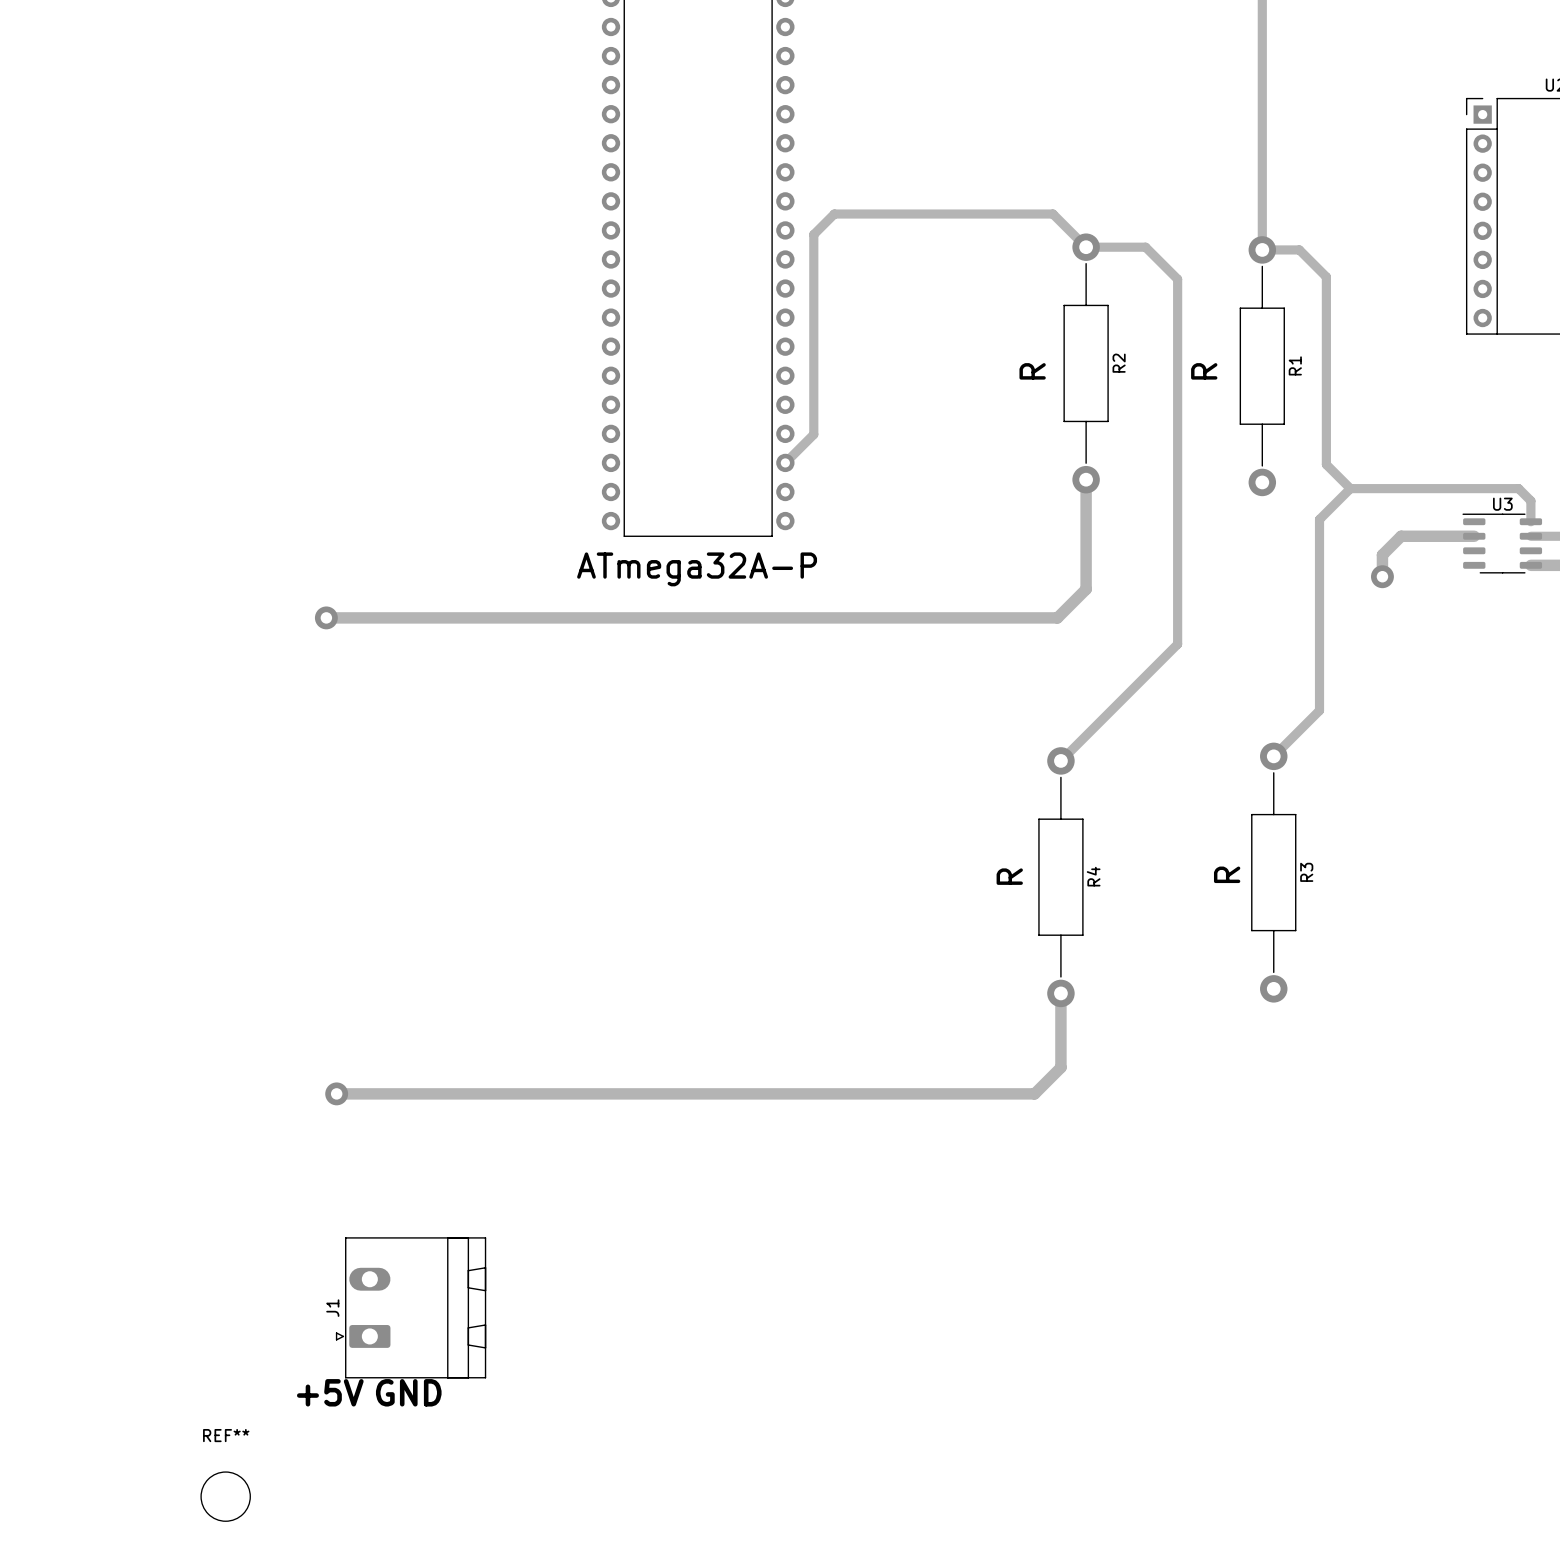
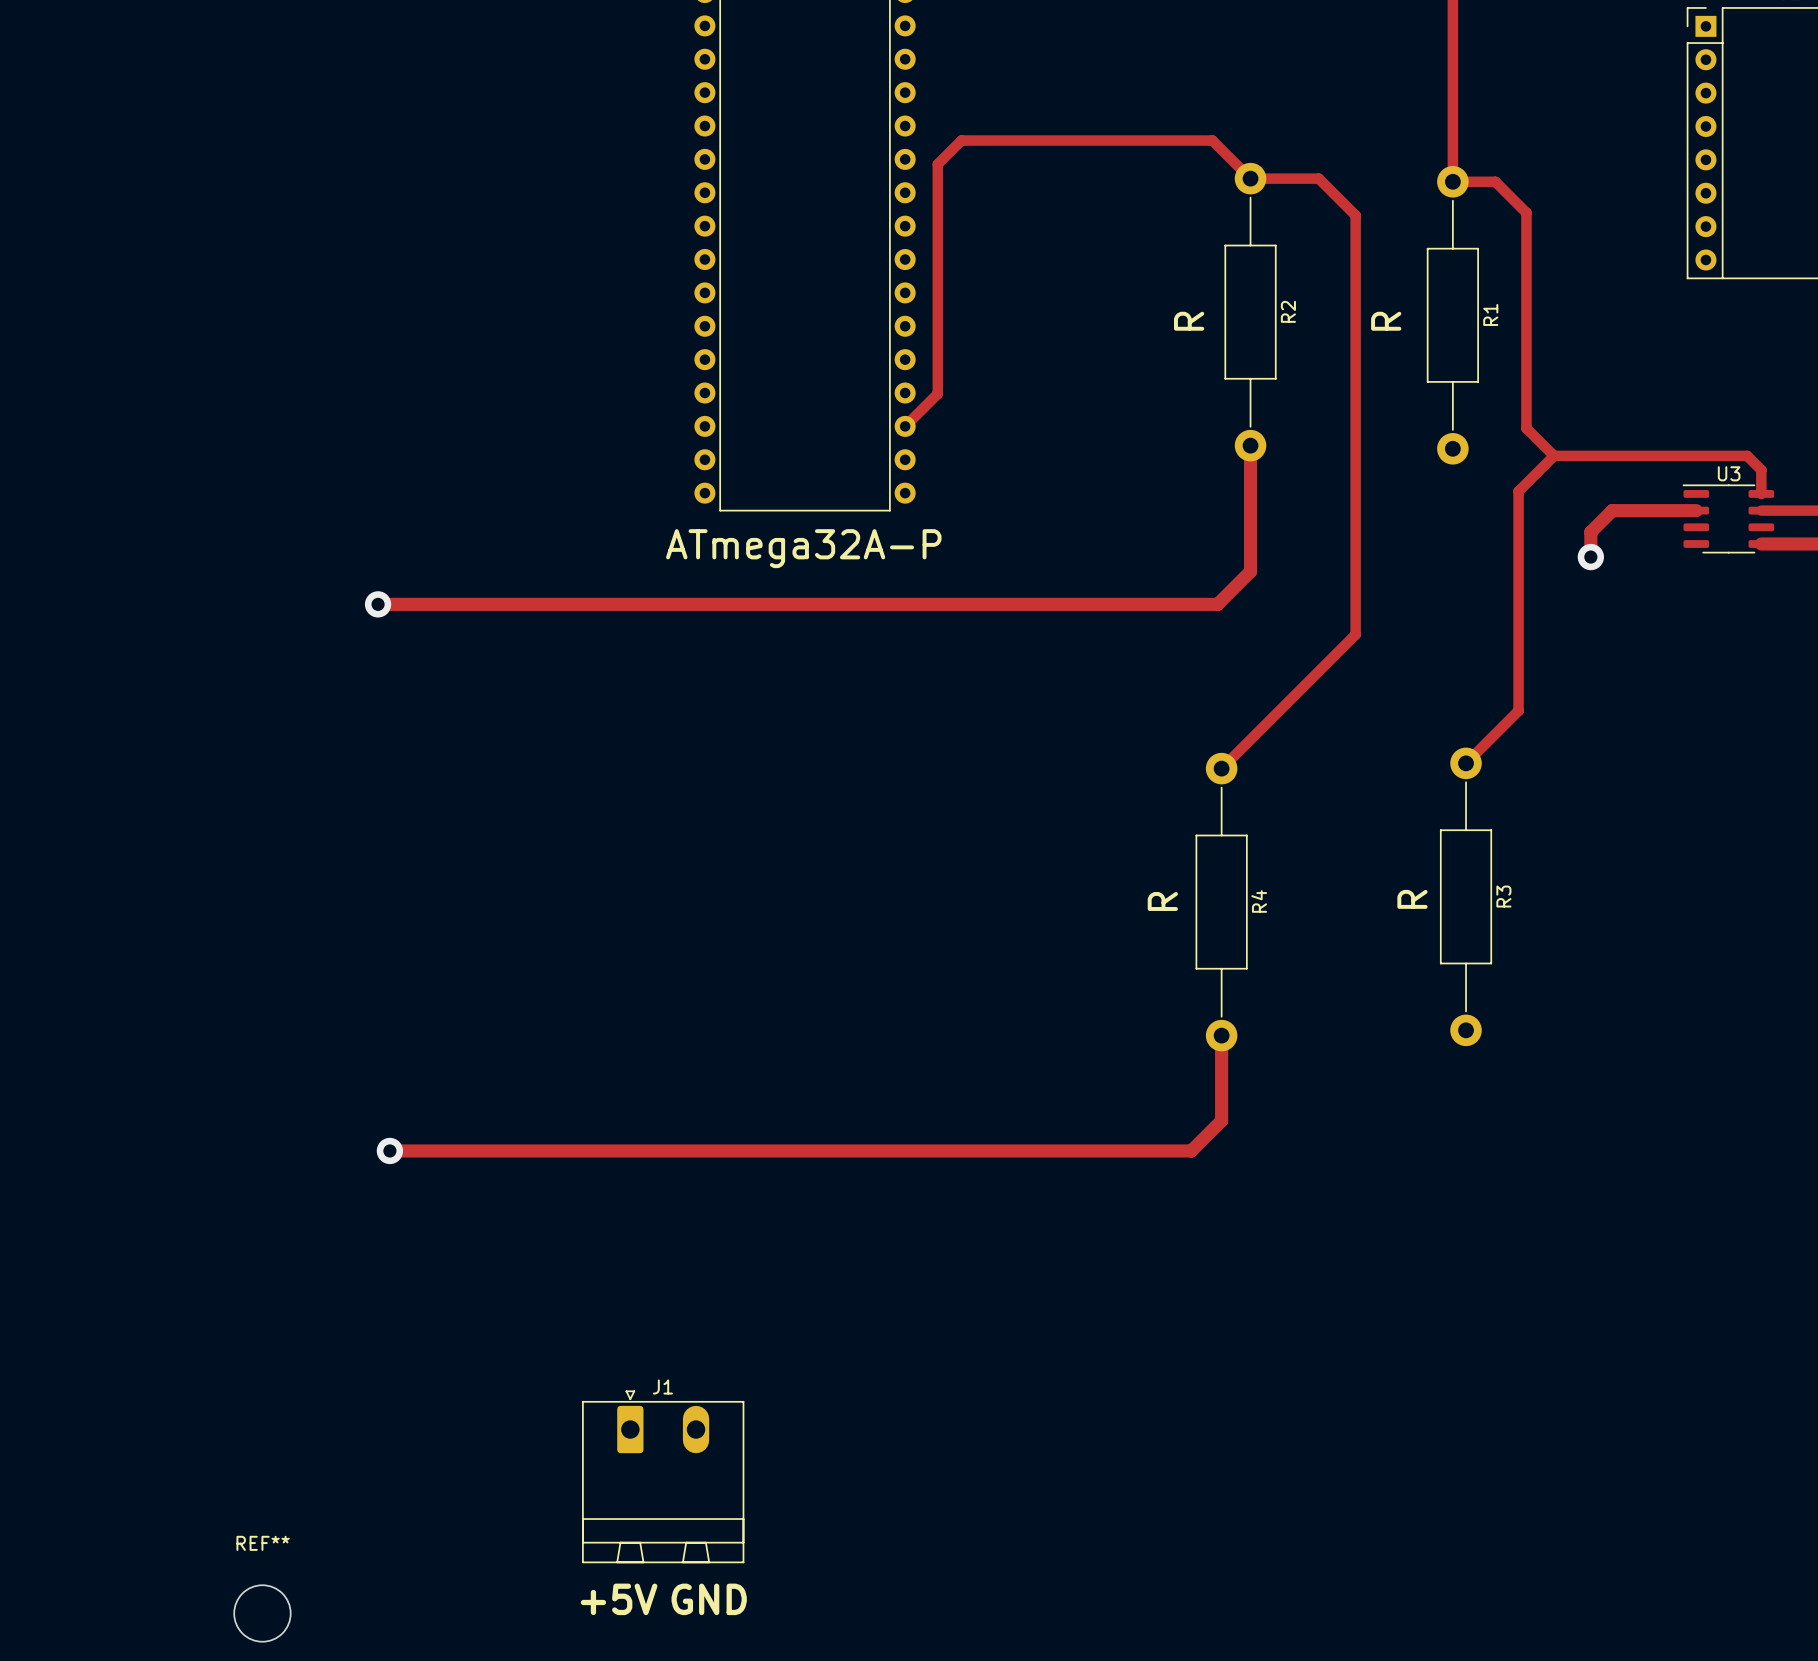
J1 rotation: 0° (411, 1307) -> 90° clockwise (663, 1476)
J1 position: (411, 1307) -> (663, 1476)
text position: +5V (330, 1392) -> +5V (619, 1599)
text position: GND (408, 1392) -> GND (709, 1599)

